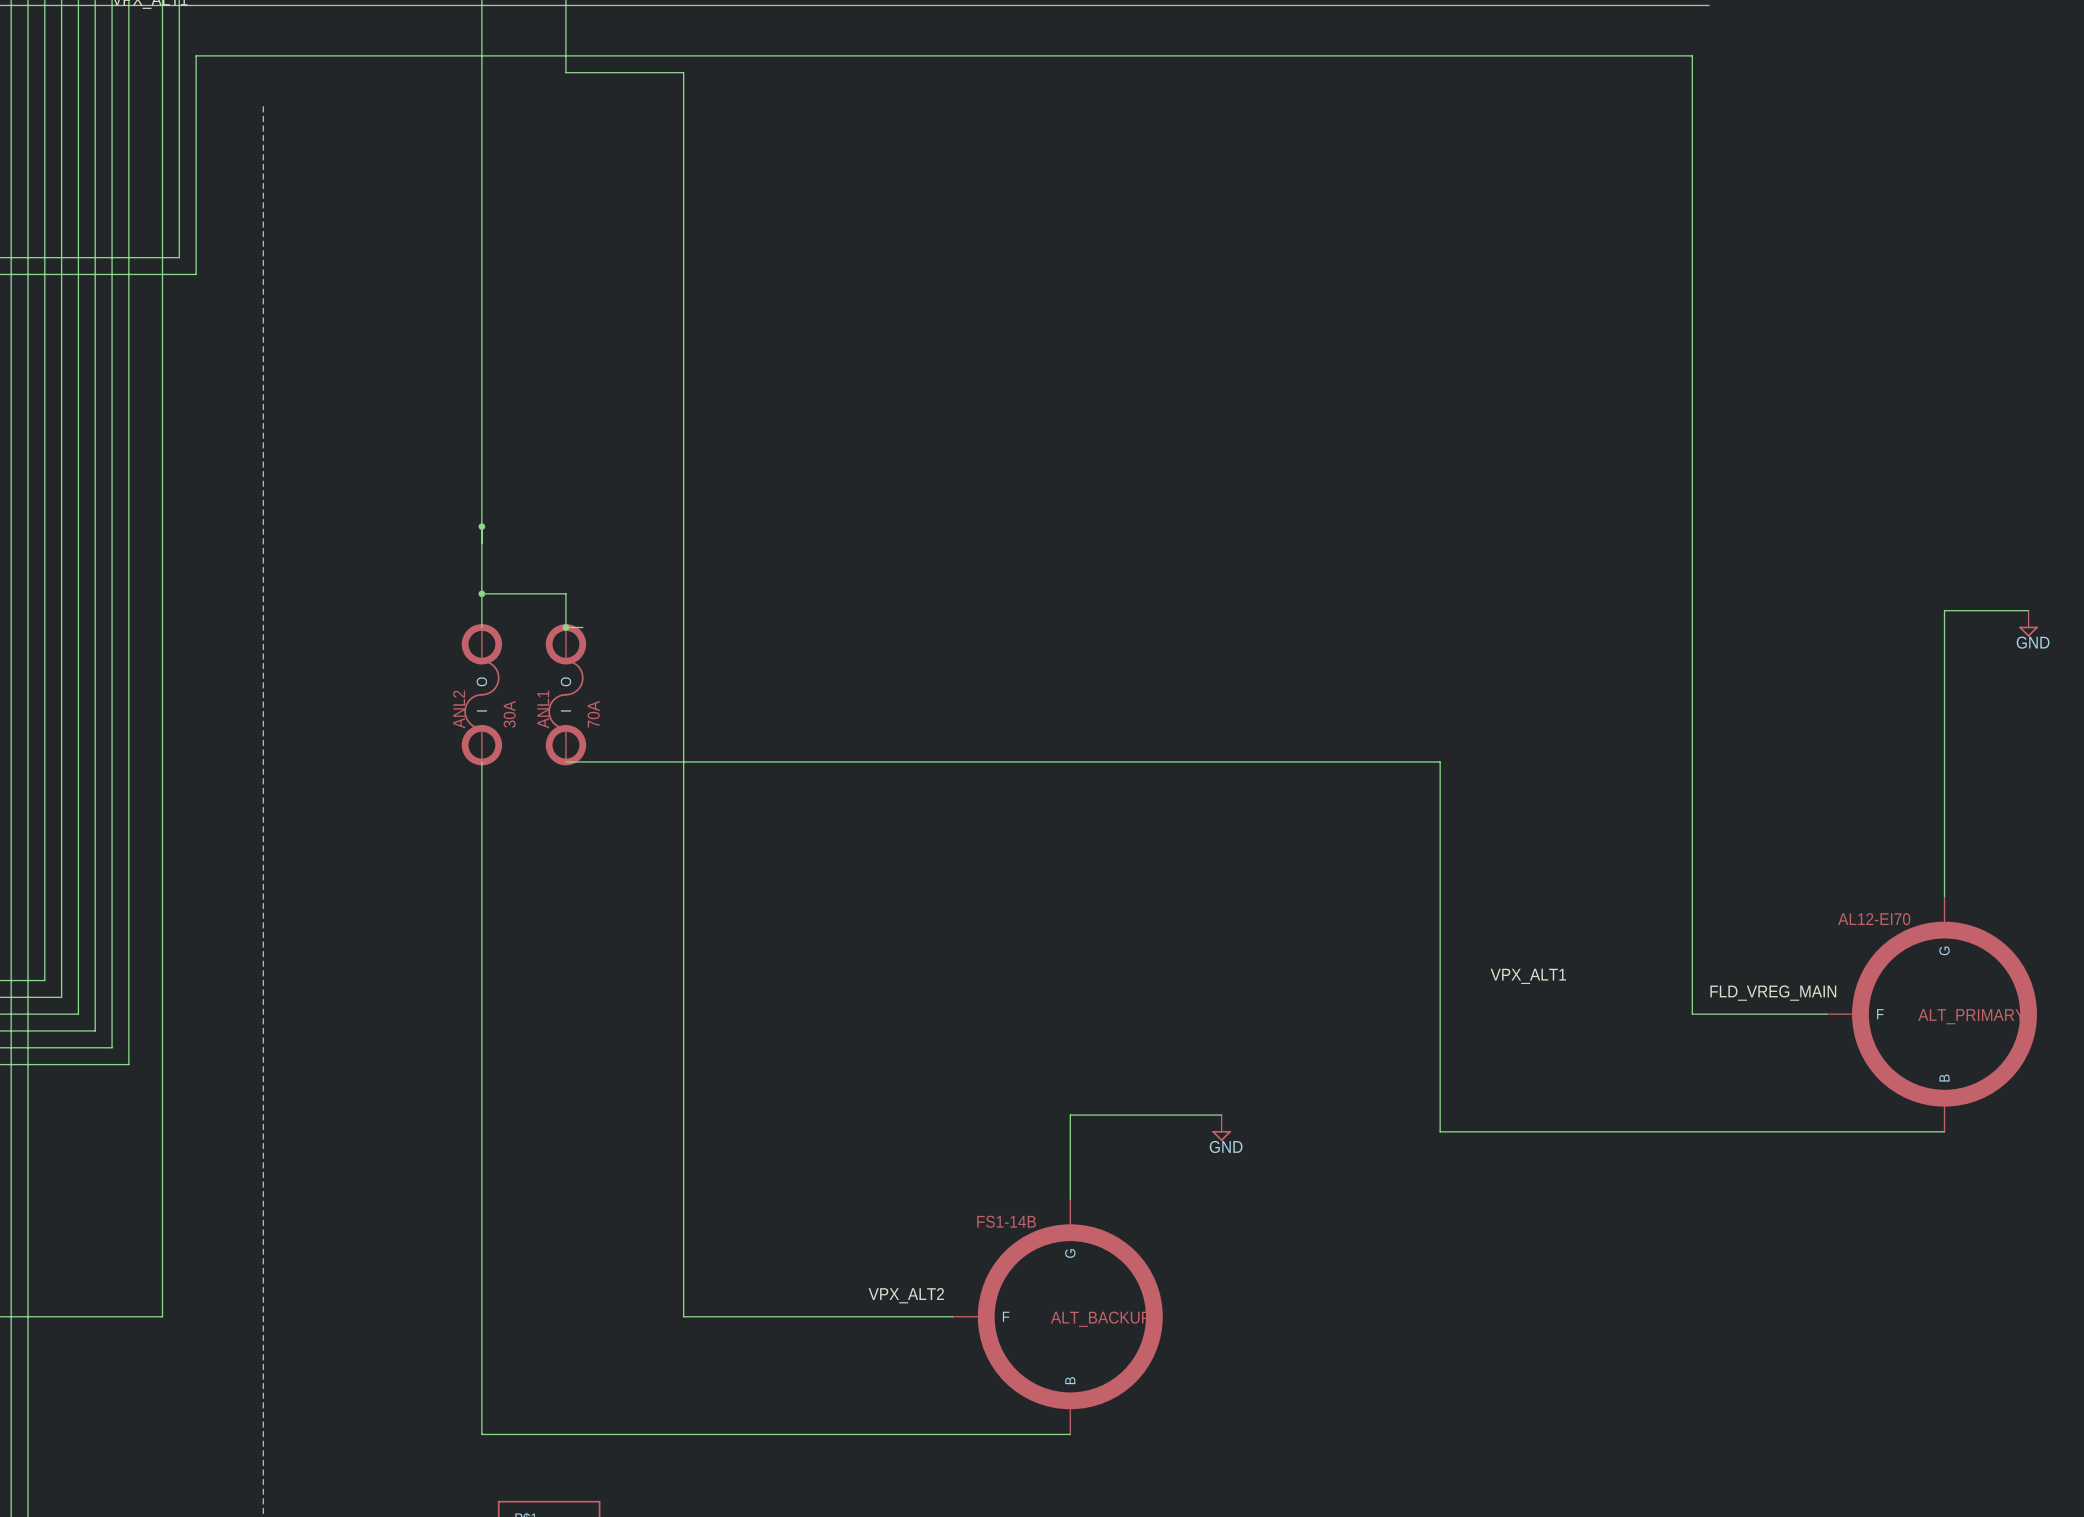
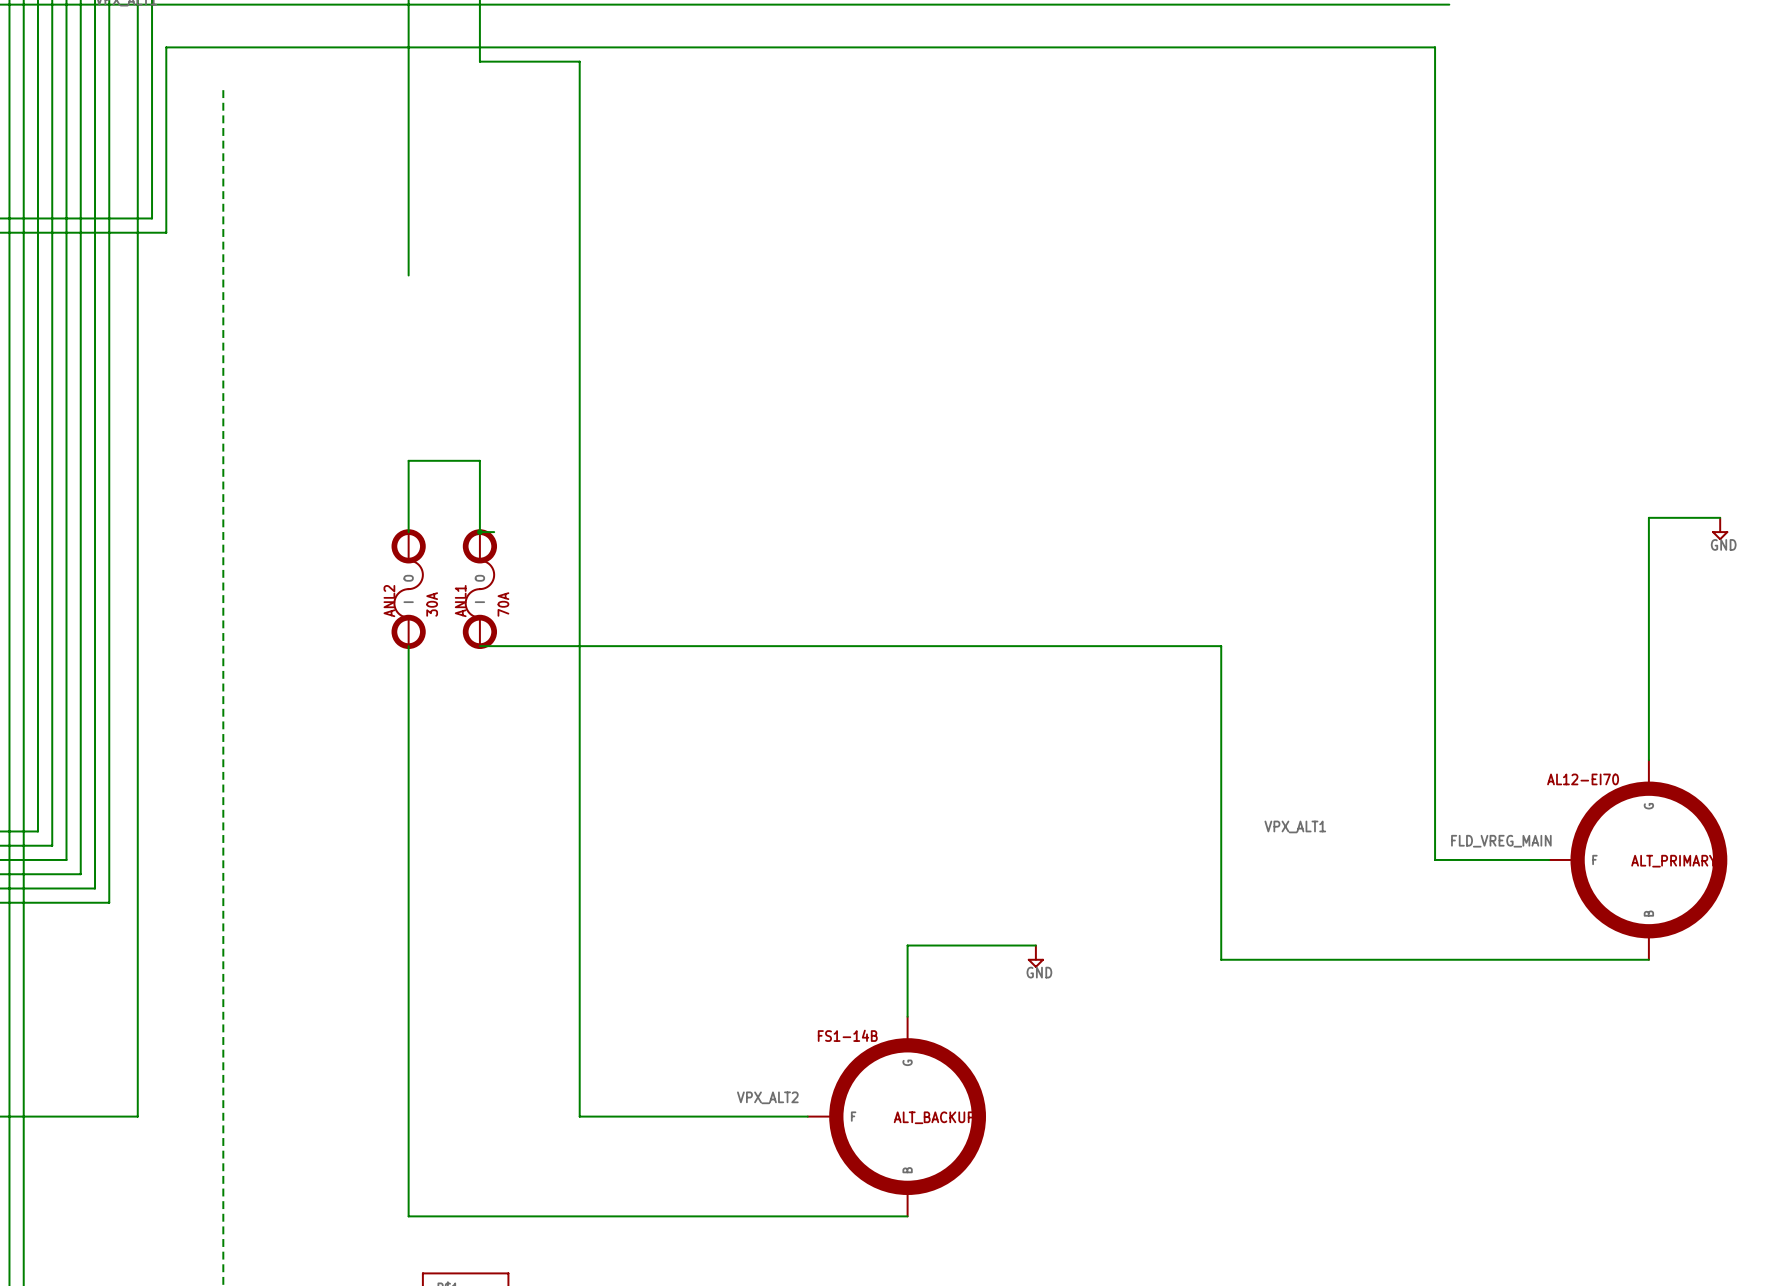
wire: (481, 324) (481, 543) -> none
junction: (481, 526) -> none
wire: (481, 593) (565, 593) -> (408, 460) (479, 460) (479, 503)
junction: (481, 593) -> none

